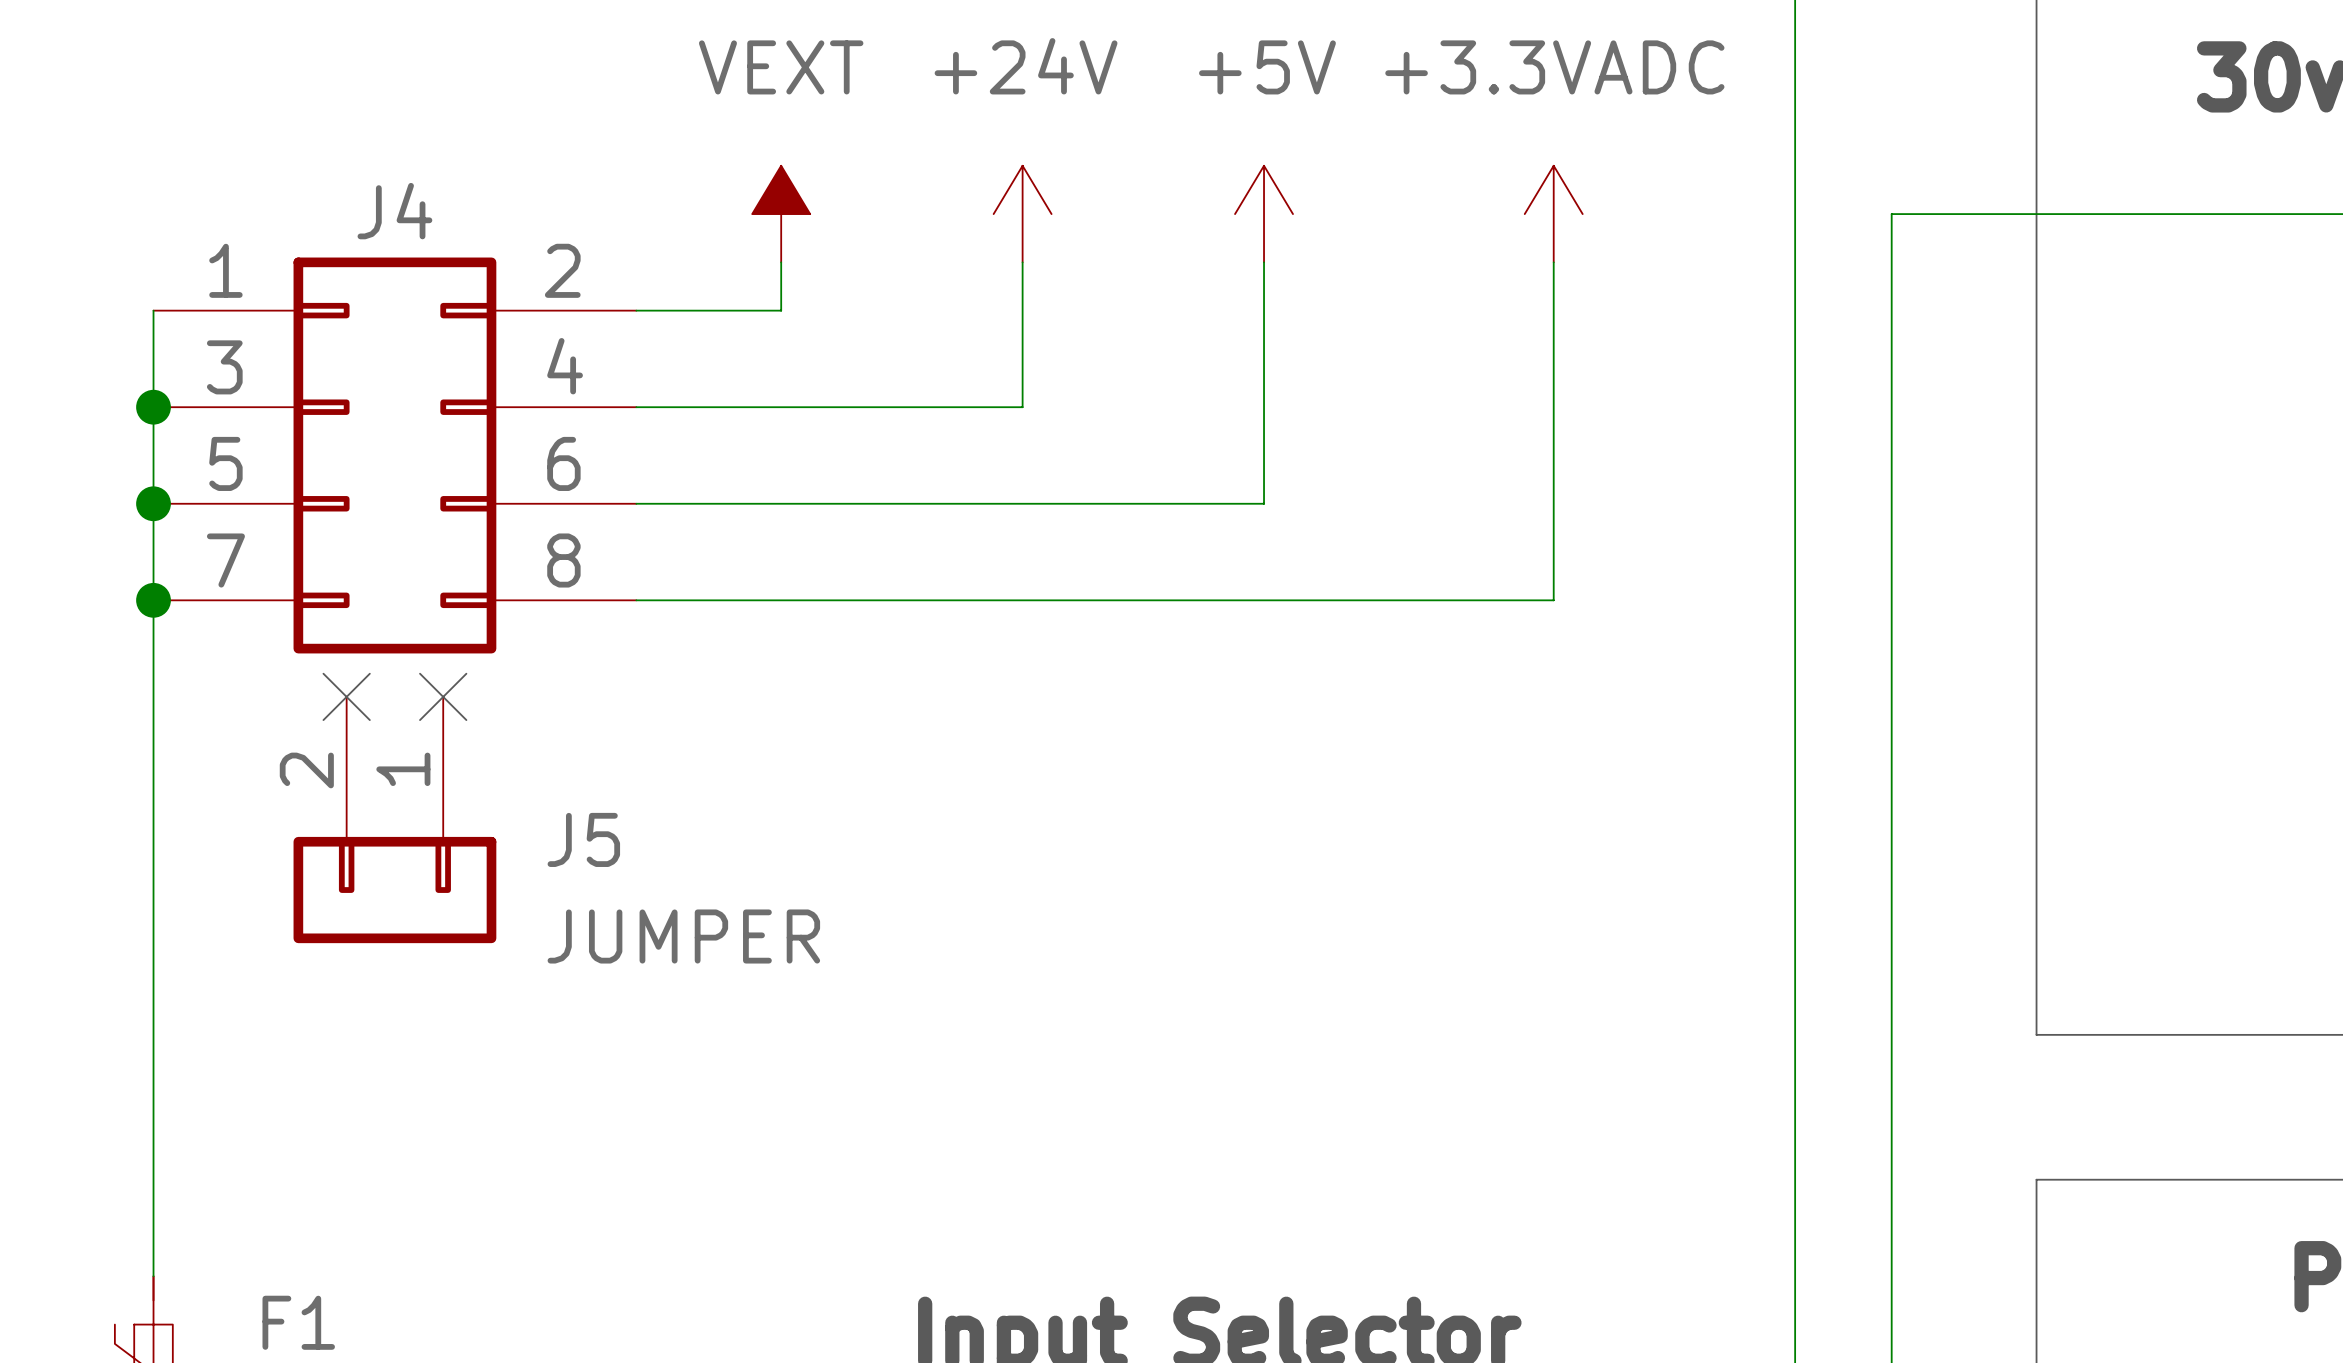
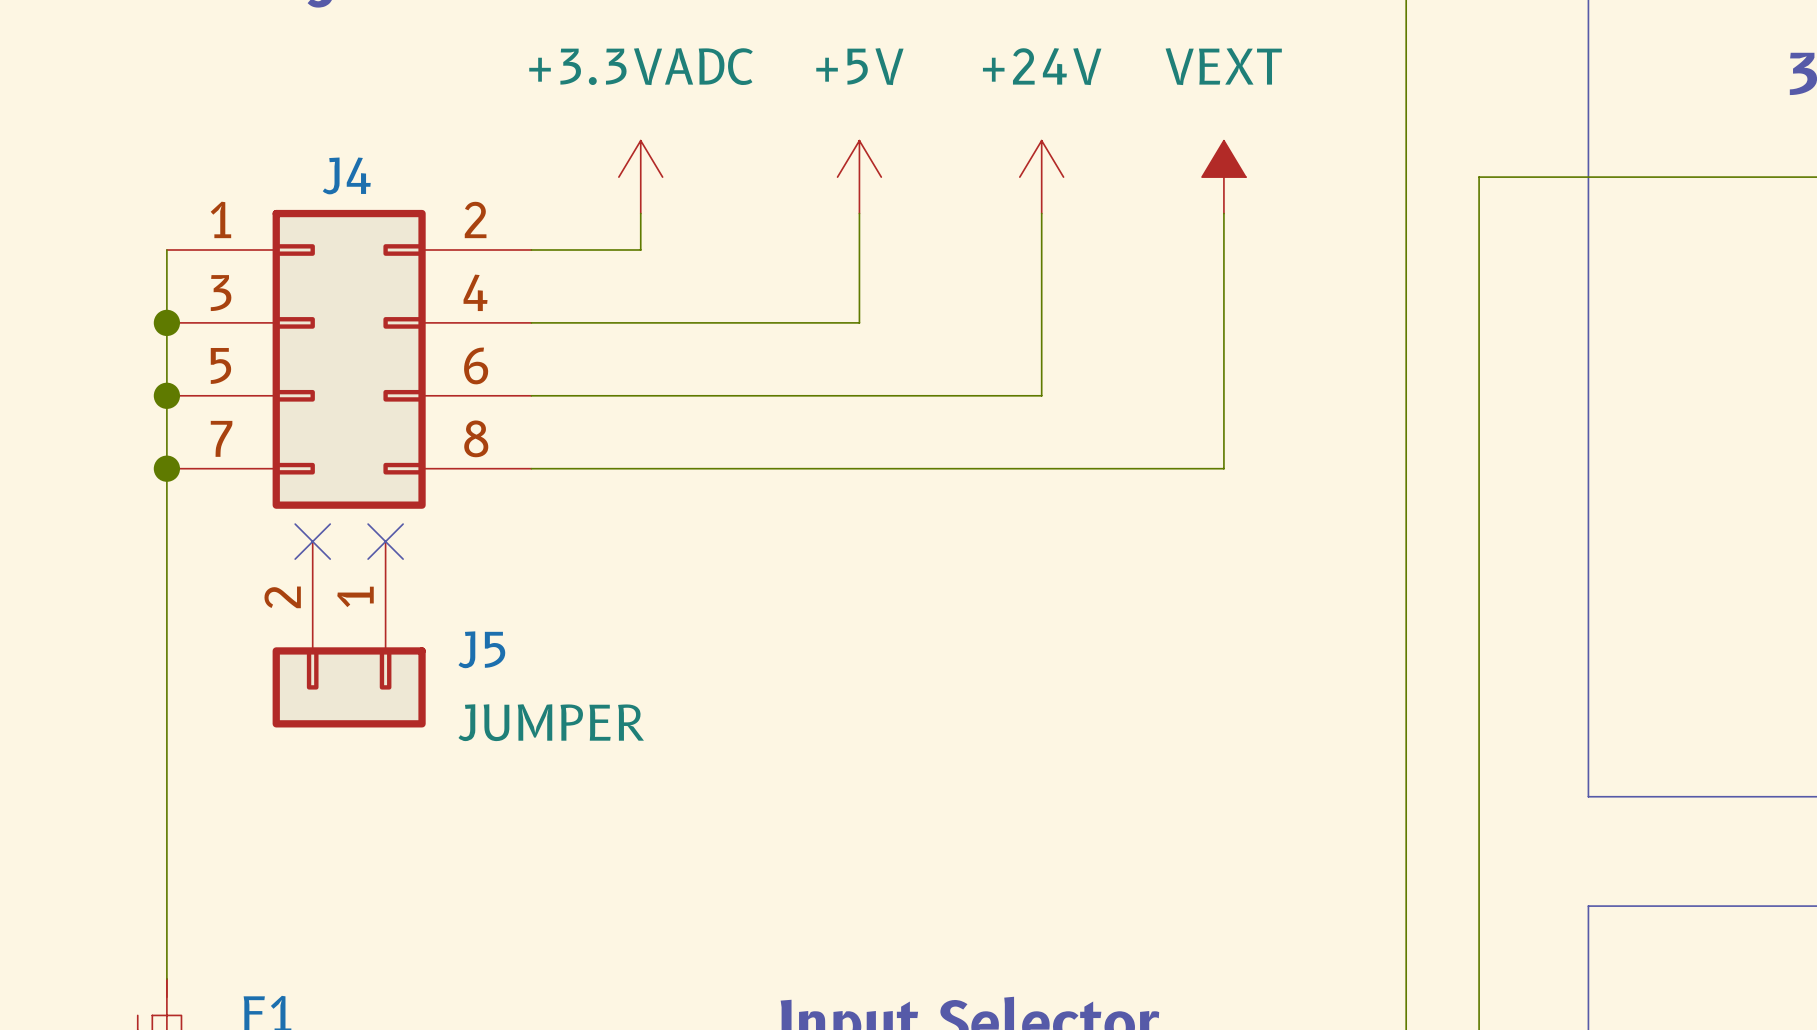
power symbol: VEXT (781, 214) -> +3.3VADC (640, 177)
power symbol position: +24V (1022, 214) -> +24V (1041, 177)
power symbol position: +5V (1264, 214) -> +5V (859, 177)
power symbol: +3.3VADC (1553, 214) -> VEXT (1223, 177)
wire: (1022, 262) (1022, 407) -> (859, 213) (859, 322) (822, 322)
wire: (1264, 262) (1264, 503) -> (1041, 213) (1041, 395) (1005, 395)

